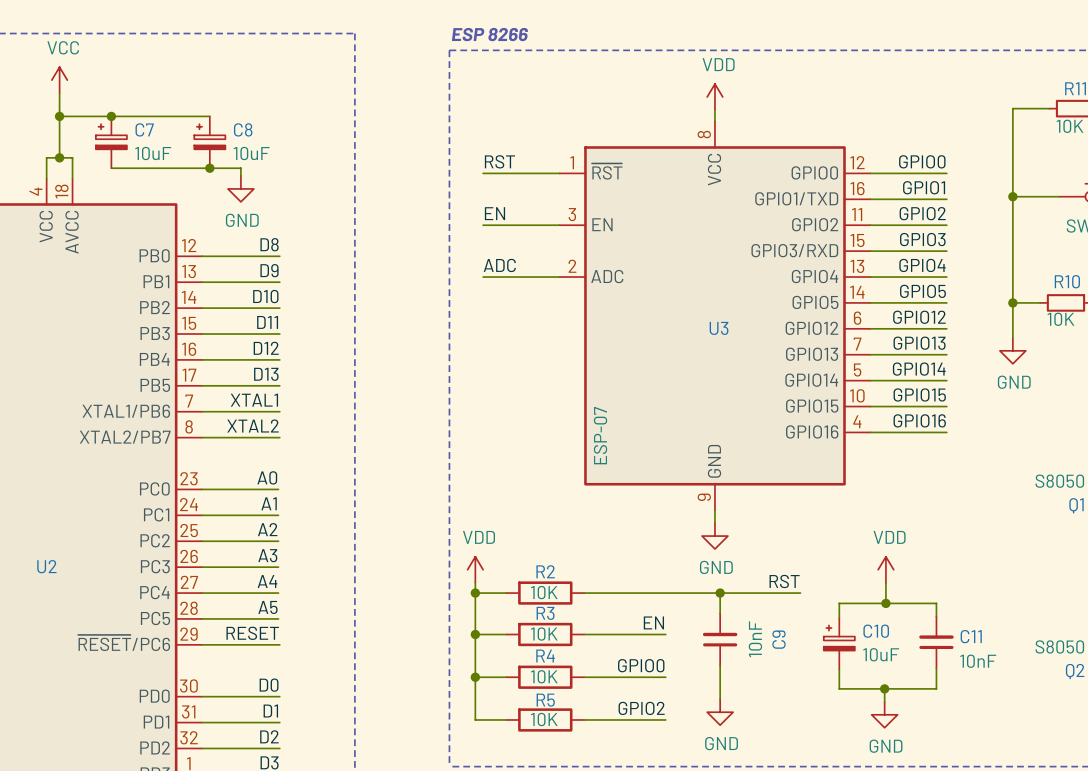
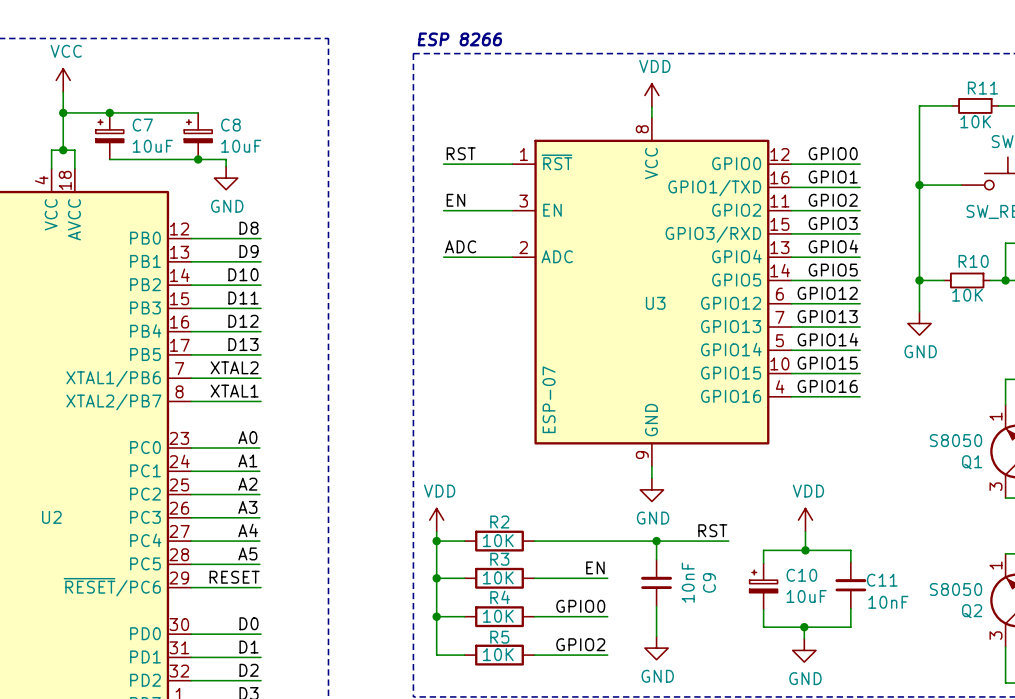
label: XTAL1 (254, 400) -> XTAL2 (234, 367)
label: XTAL2 (253, 425) -> XTAL1 (234, 391)

